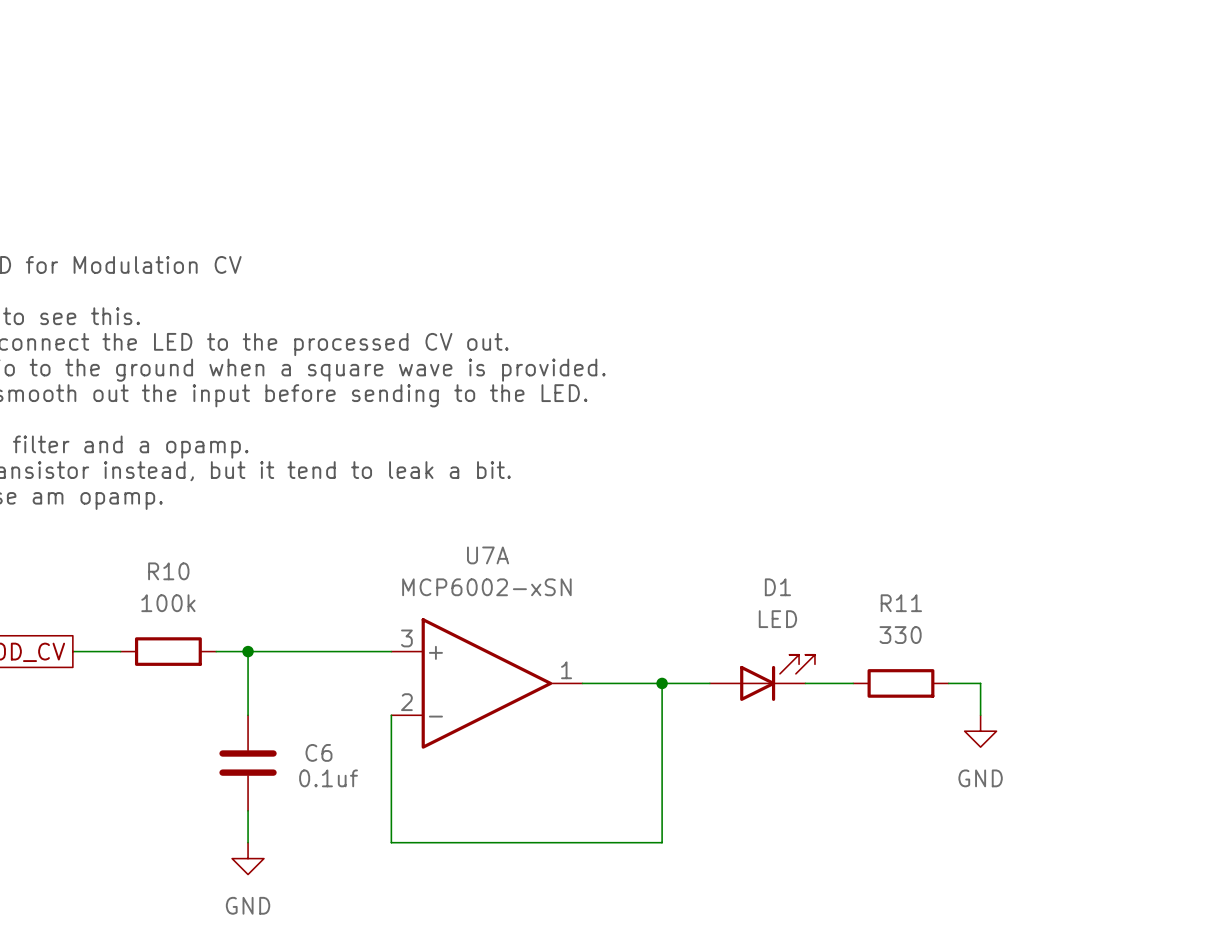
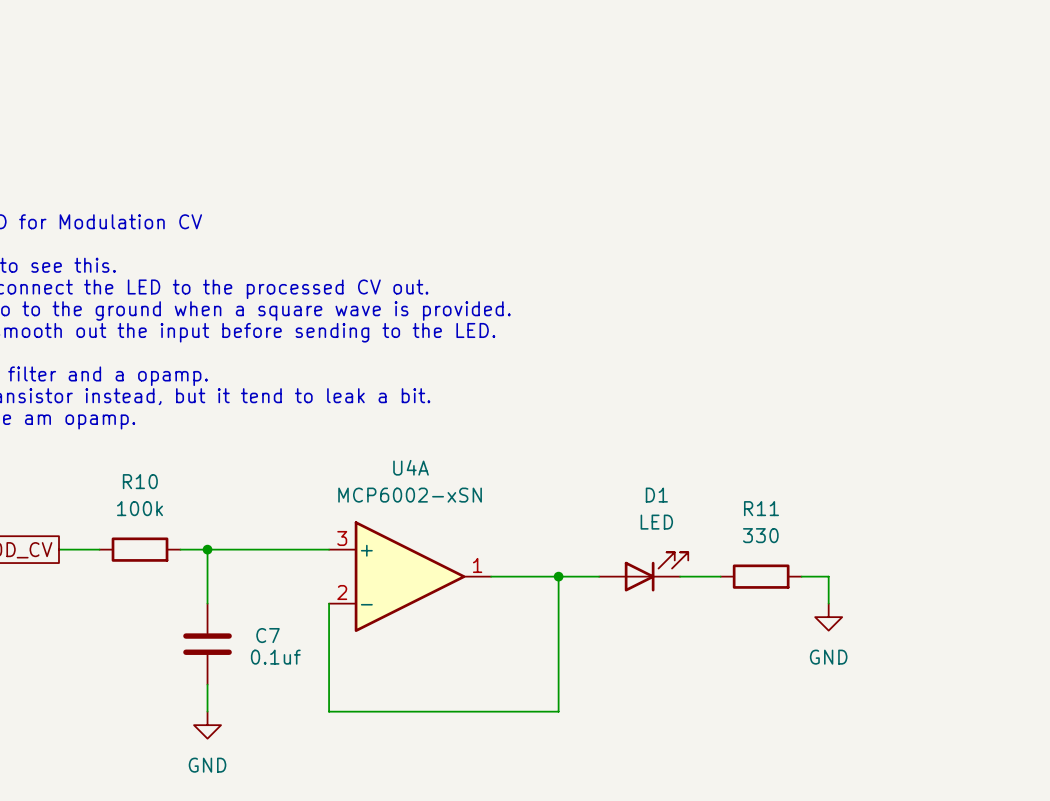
U7A name: U7A (488, 555) -> U4A (411, 467)
C6 name: C6 (318, 752) -> C7 (268, 635)

